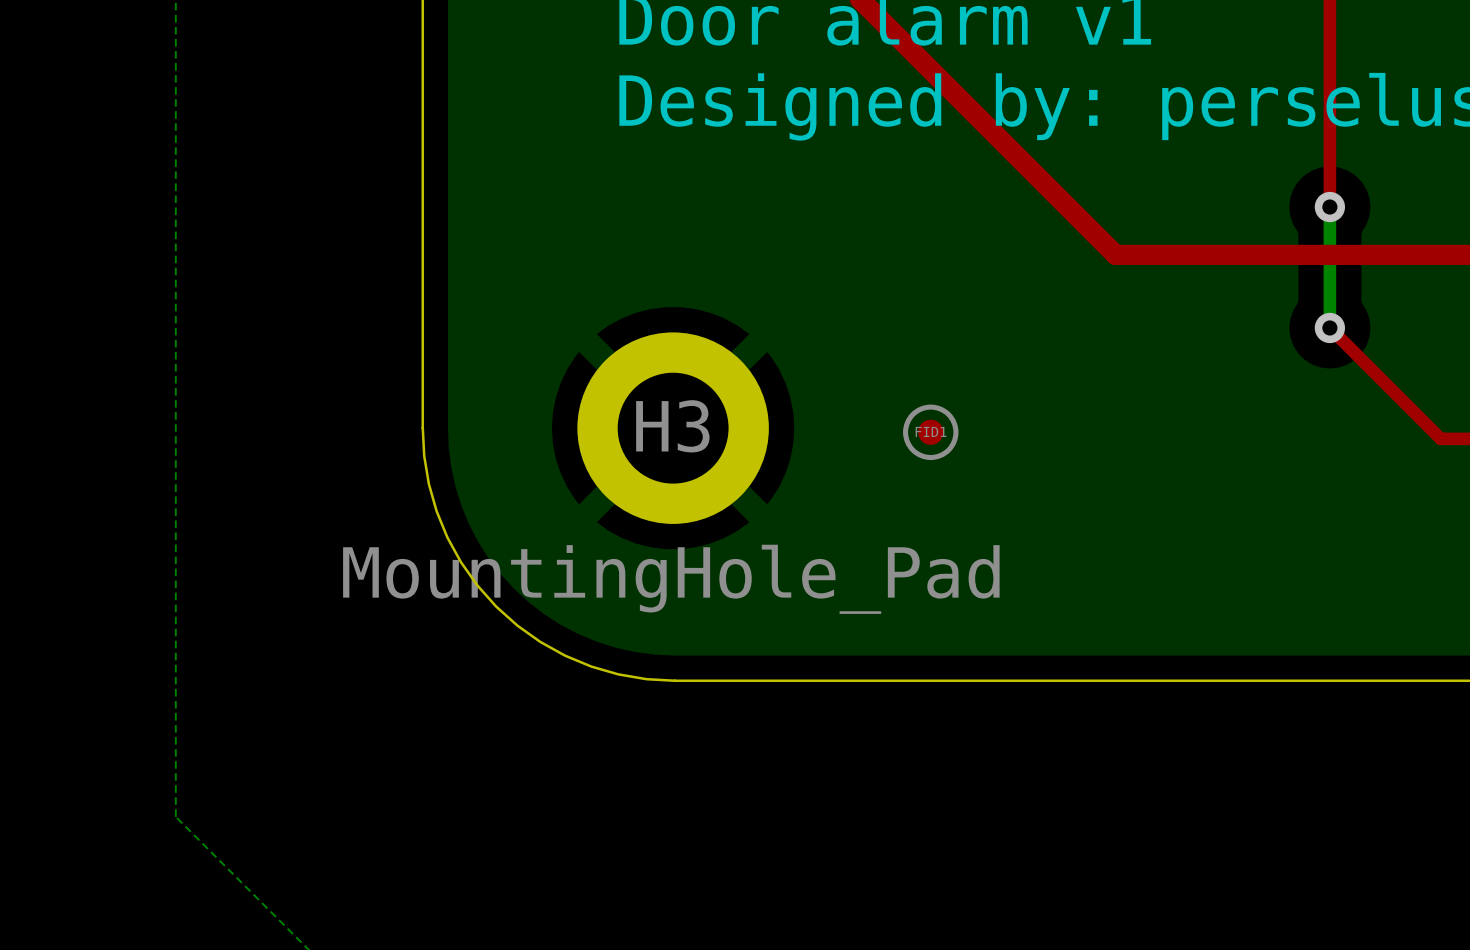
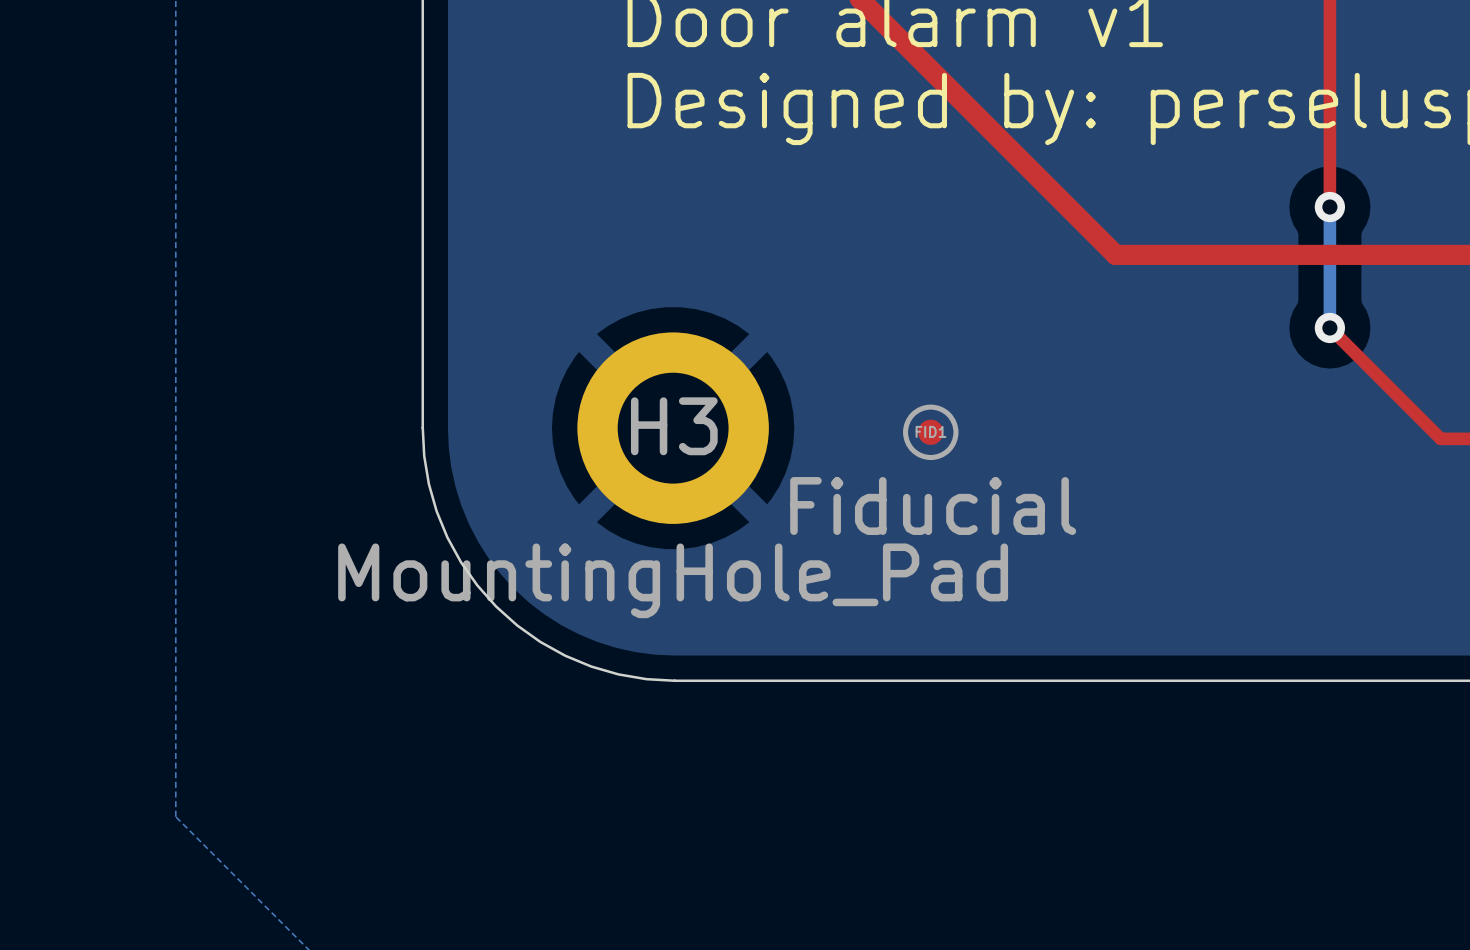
FID1 value: none -> Fiducial (933, 506)

